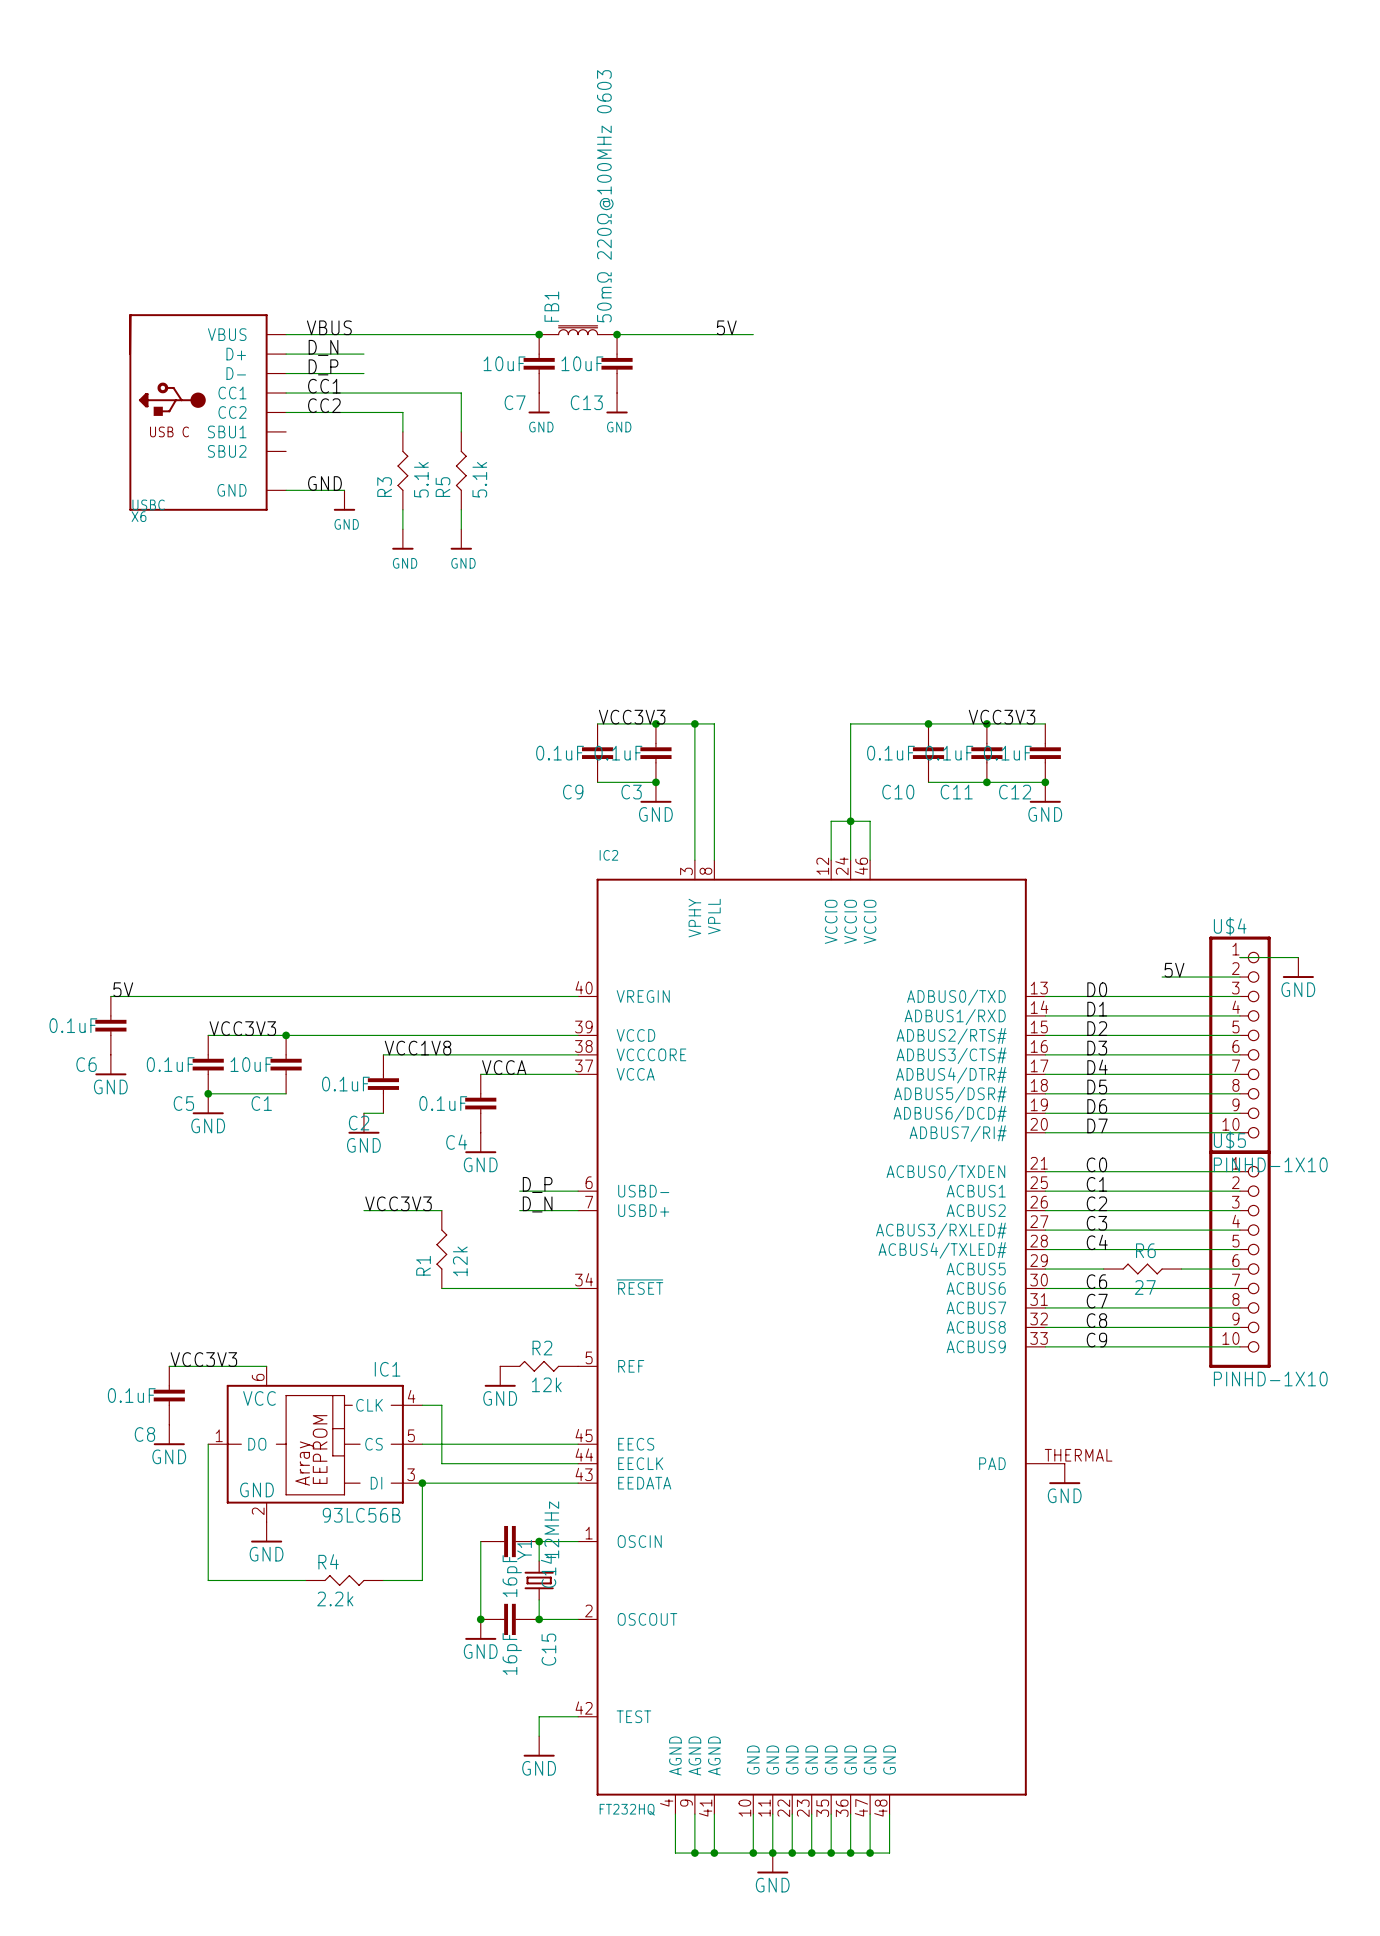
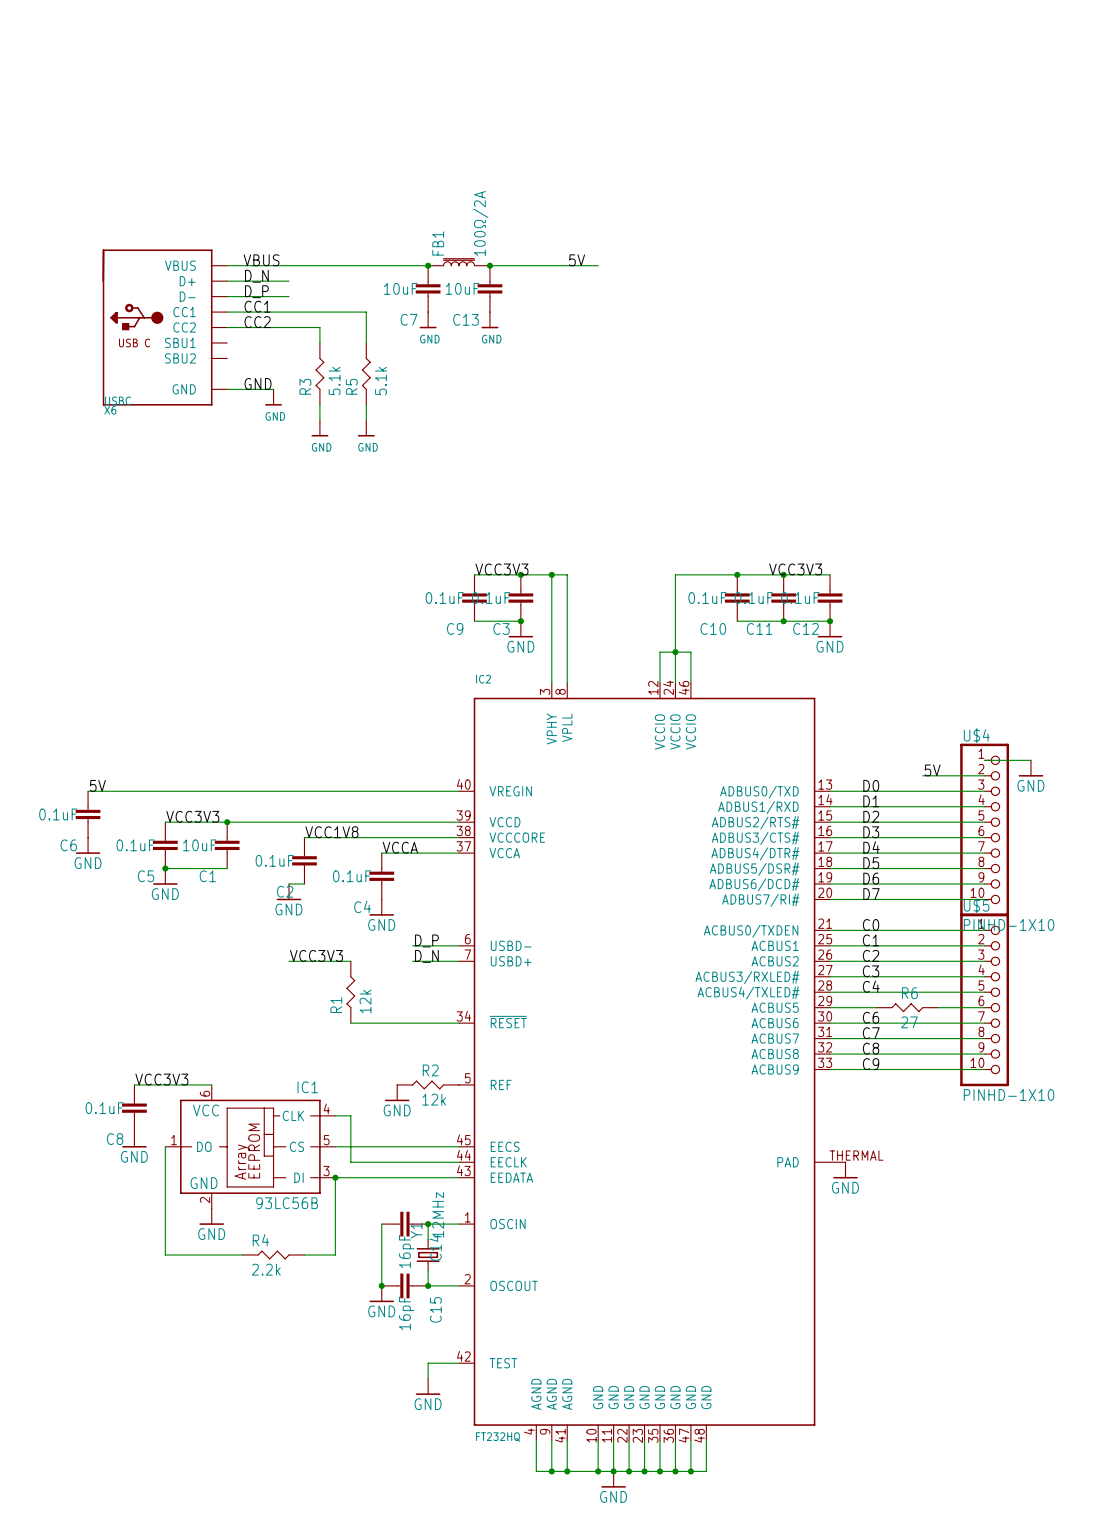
FB1 value: 50mΩ 220Ω@100MHz 0603 (605, 196) -> 100Ω/2A (480, 223)

